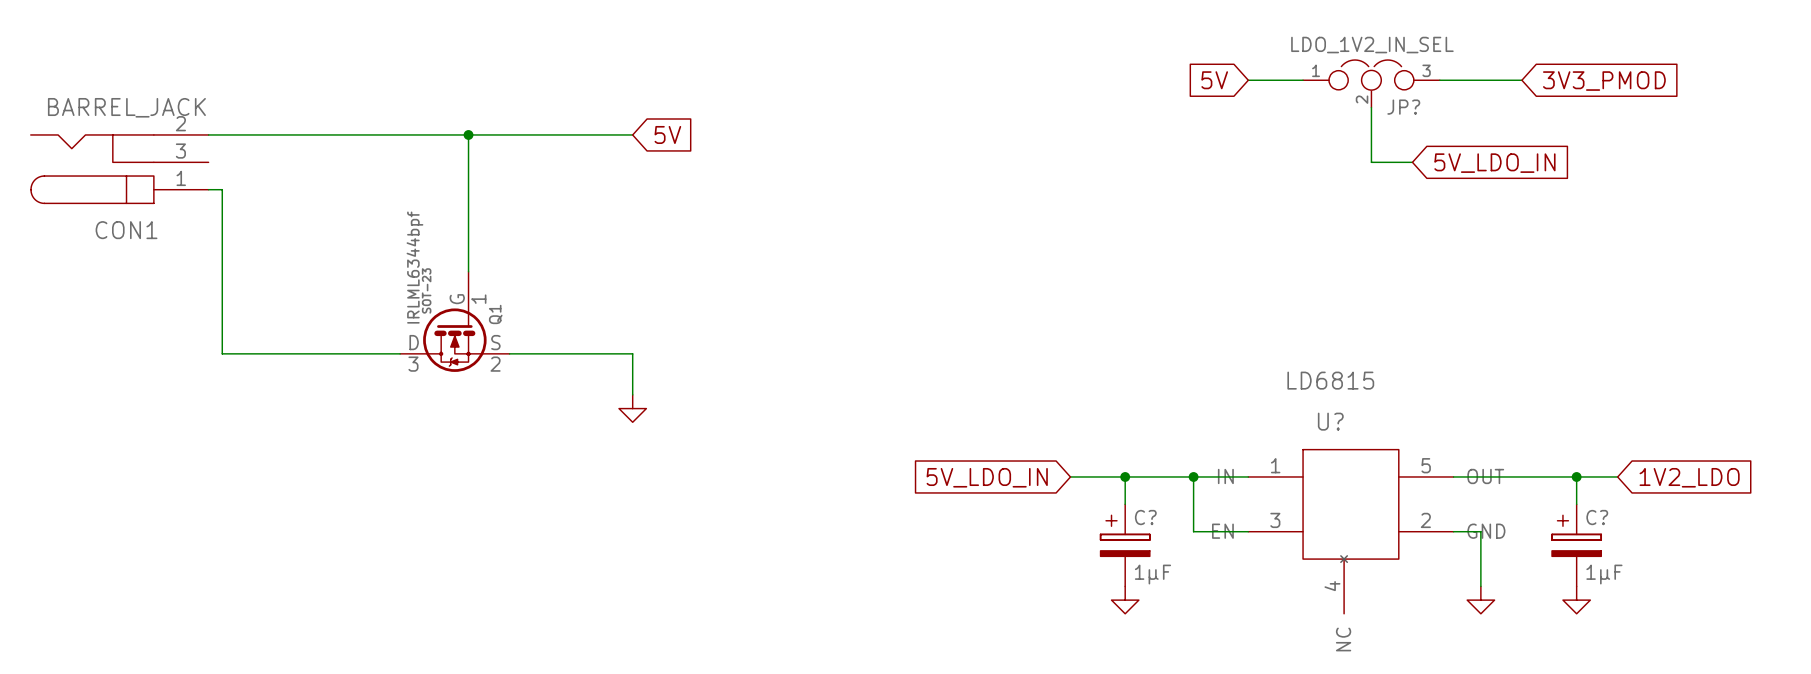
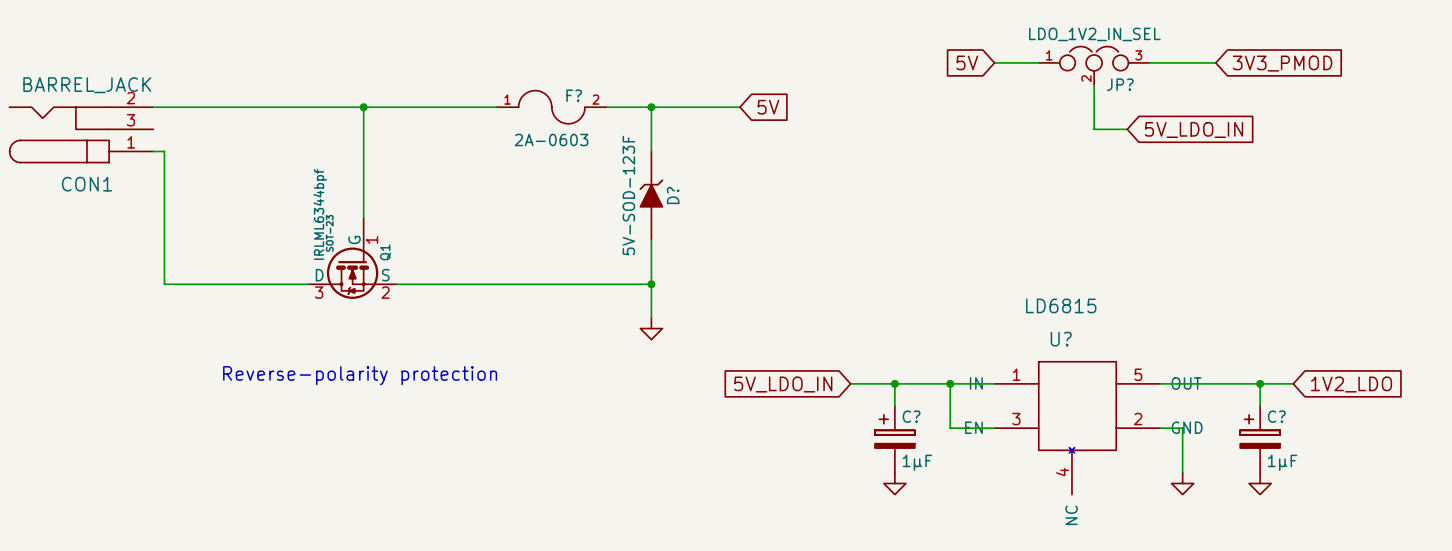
global label: 5V (667, 134) -> none
F?: none -> 2A-0603 (551, 107)
wire: none -> (607, 107) (739, 107)
wire: none -> (651, 107) (651, 151)
junction: none -> (651, 107)
global label: none -> 5V (768, 107)
D?: none -> 5V-SOD-123F (651, 195)
wire: none -> (651, 240) (651, 317)
wire: (632, 353) (632, 394) -> (496, 284) (651, 284)
junction: none -> (651, 284)
power symbol position: (632, 408) -> (651, 328)
text: none -> Reverse-polarity protection (360, 375)

